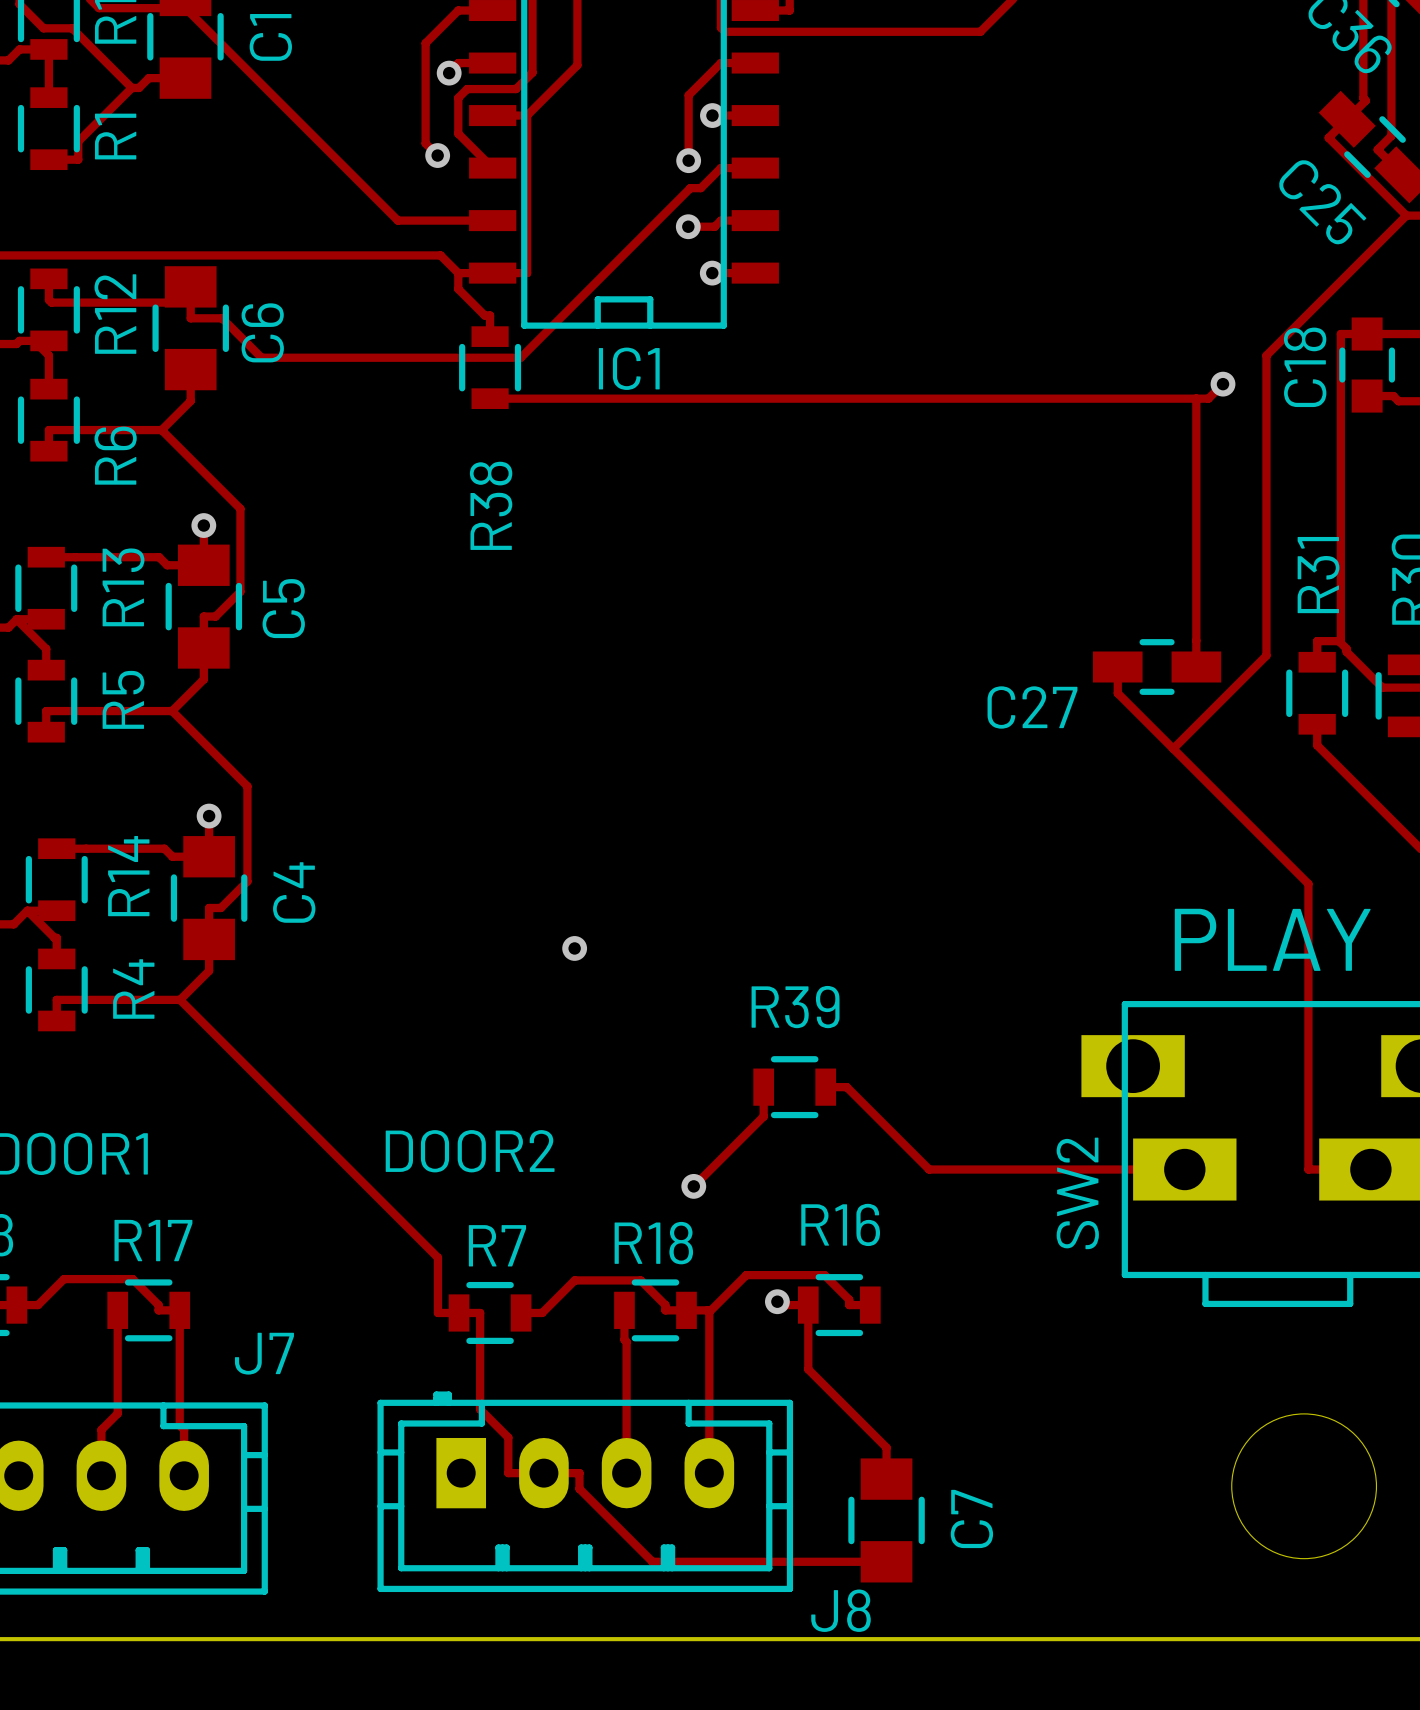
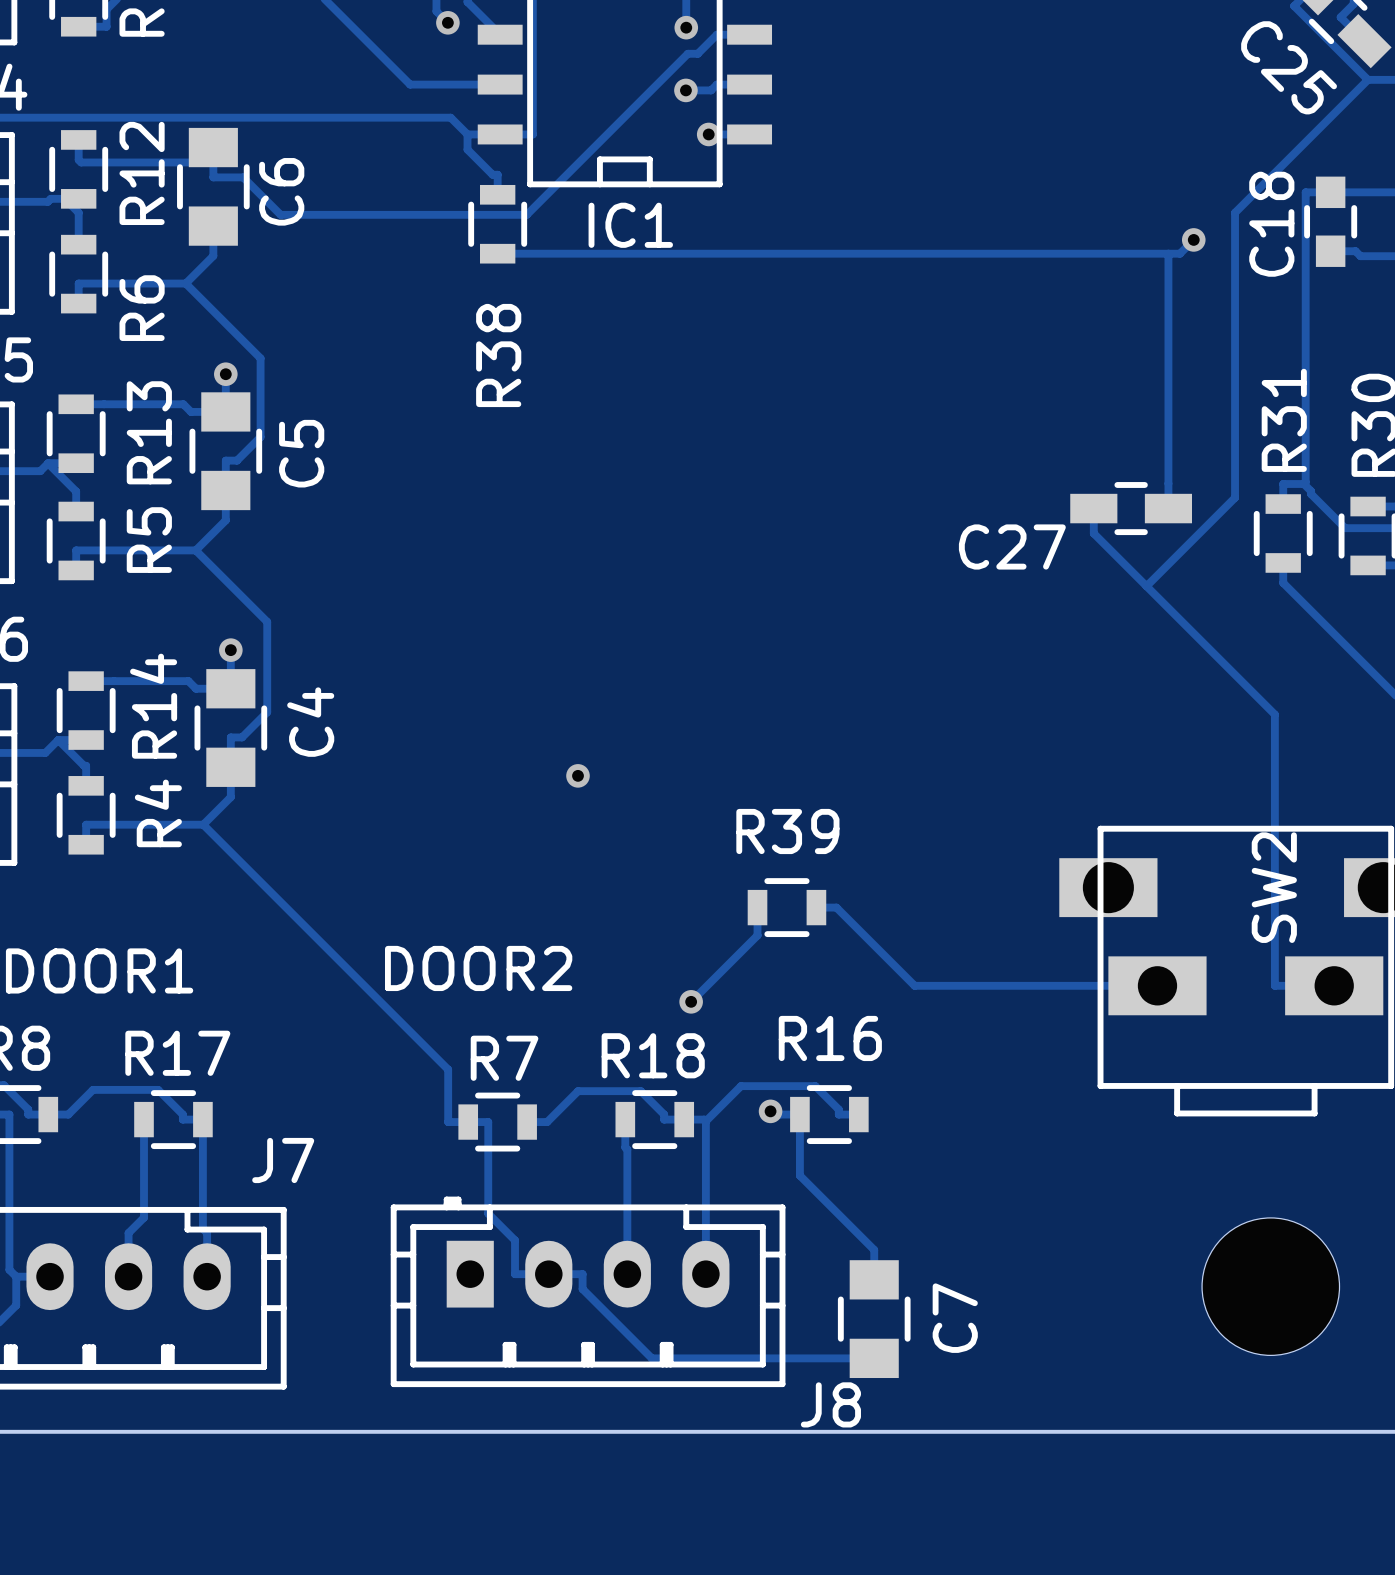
text: PLAY (1272, 939) -> none
SW2 name position: SW2 (1077, 1193) -> SW2 (1274, 887)

